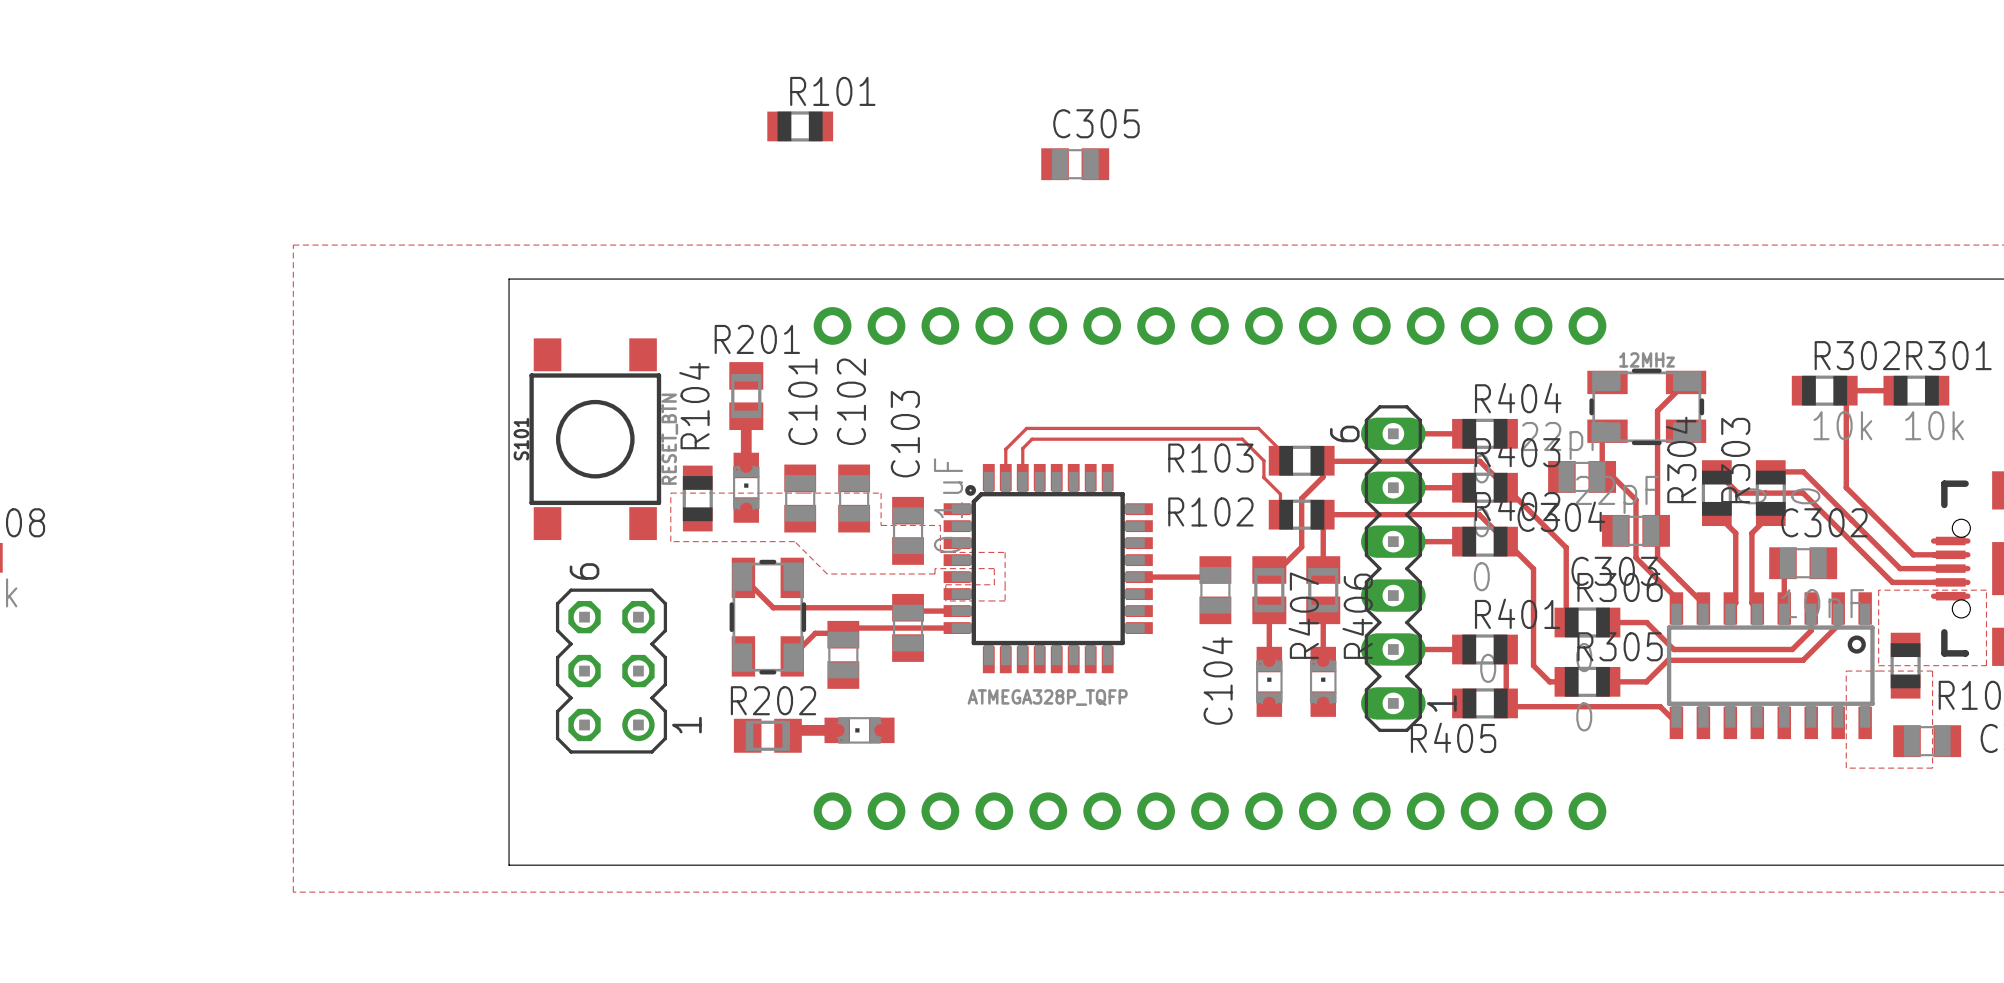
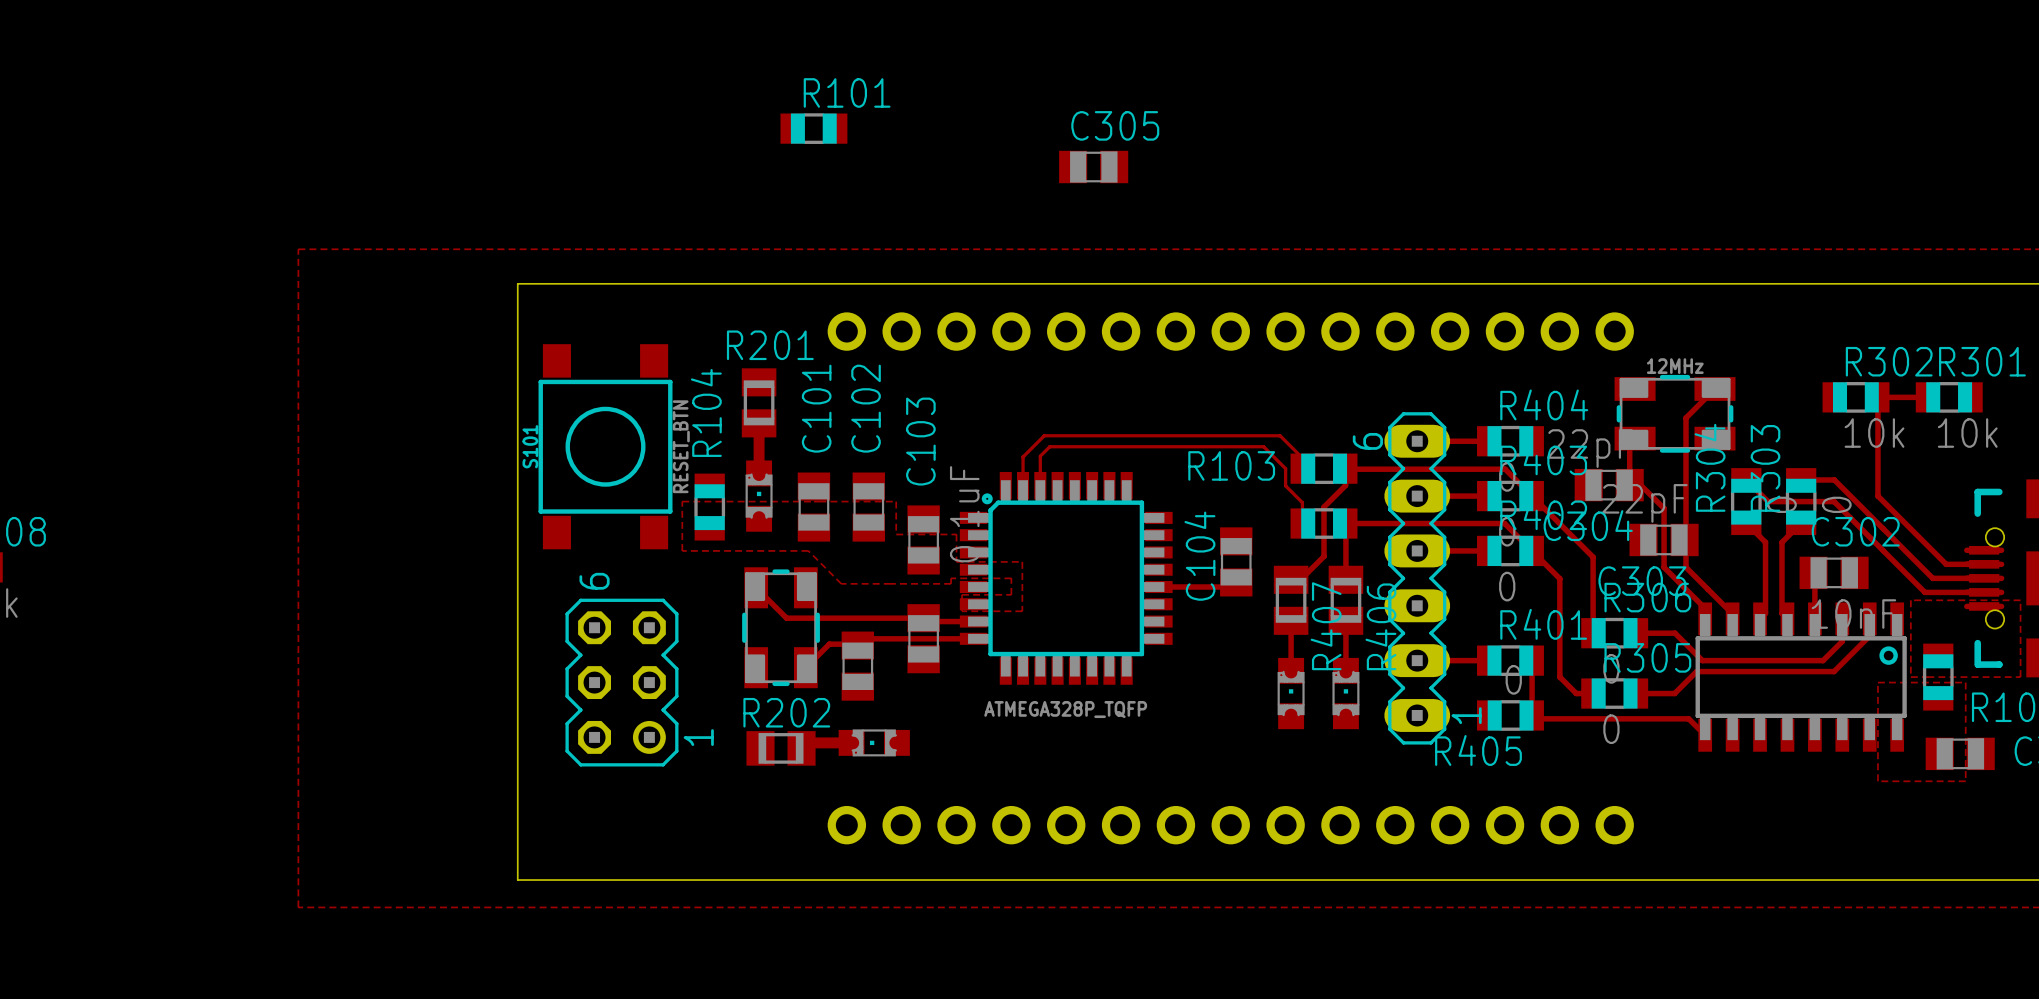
R102 name: R102 (1210, 511) -> none
C104 position: (1215, 590) -> (1236, 561)
C104 name position: C104 (1217, 680) -> C104 (1199, 556)

